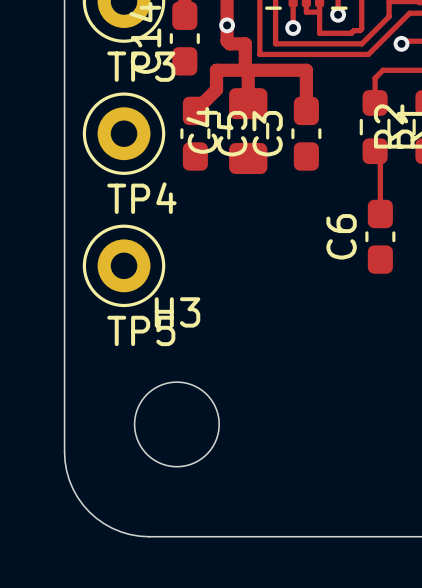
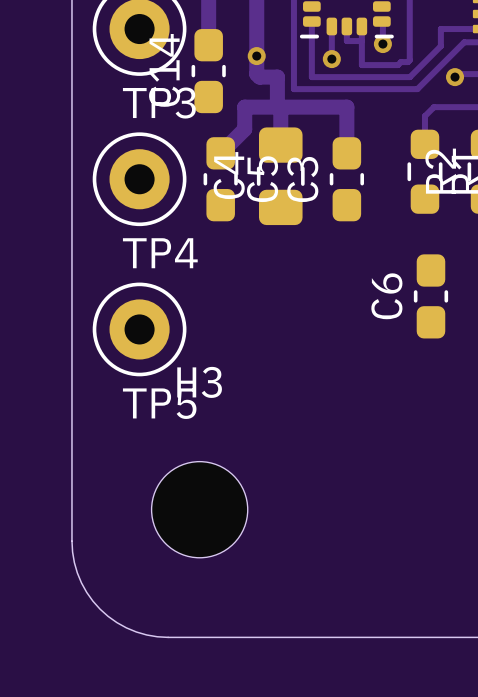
track: (375, 151) (380, 156) (380, 213) -> none

